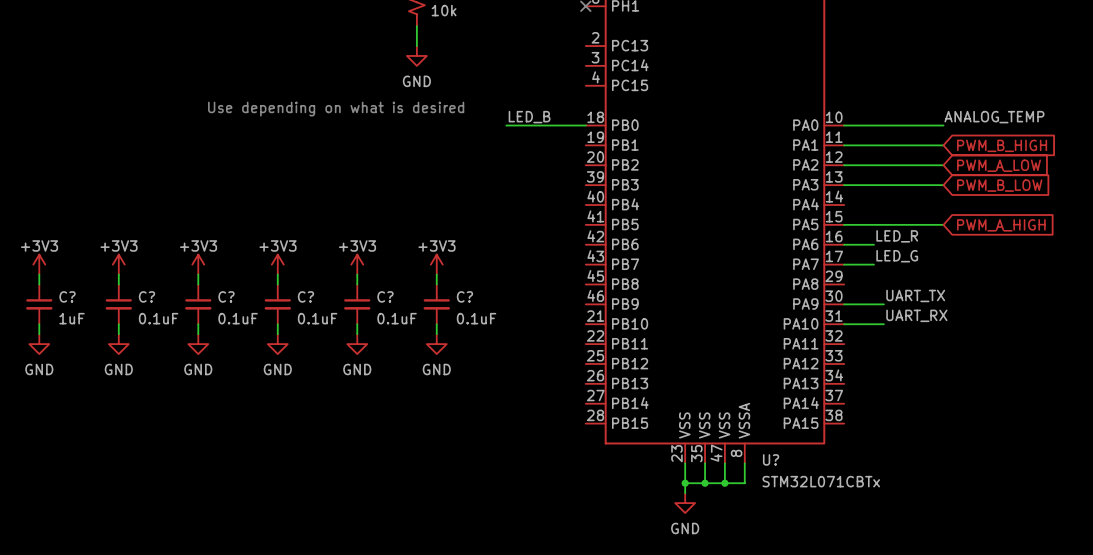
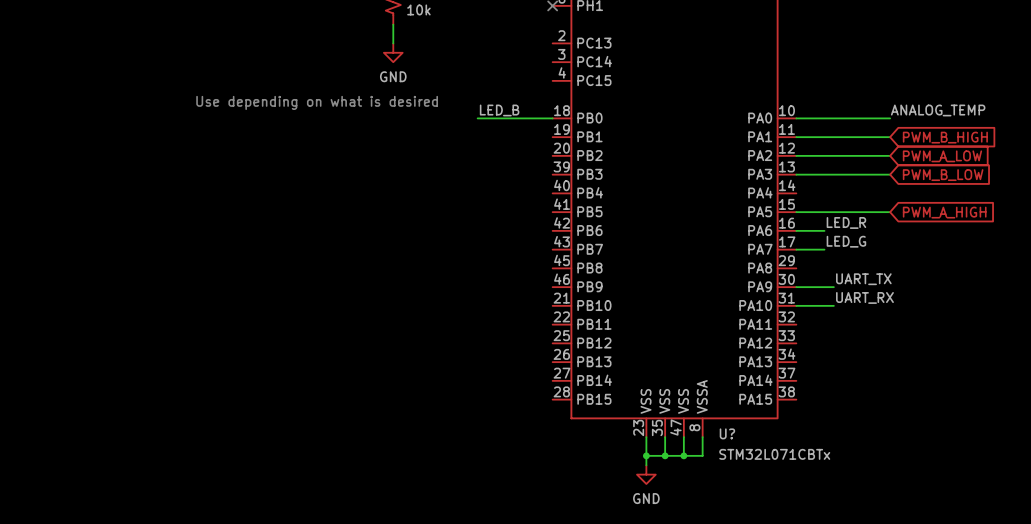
power symbol: +3V3 (39, 264) -> none
power symbol: +3V3 (118, 264) -> none
power symbol: +3V3 (198, 264) -> none
power symbol: +3V3 (277, 264) -> none
power symbol: +3V3 (357, 264) -> none
power symbol: +3V3 (436, 264) -> none
wire: (39, 274) (39, 284) -> none
wire: (118, 274) (118, 284) -> none
wire: (198, 274) (198, 284) -> none
wire: (277, 274) (277, 284) -> none
wire: (357, 274) (357, 284) -> none
wire: (436, 274) (436, 284) -> none
C?: 1uF (39, 304) -> none
C?: 0.1uF (118, 304) -> none
C?: 0.1uF (198, 304) -> none
C?: 0.1uF (277, 304) -> none
C?: 0.1uF (357, 304) -> none
C?: 0.1uF (436, 304) -> none
wire: (39, 324) (39, 334) -> none
wire: (118, 324) (118, 334) -> none
wire: (198, 324) (198, 334) -> none
wire: (277, 324) (277, 334) -> none
wire: (357, 324) (357, 334) -> none
wire: (436, 324) (436, 334) -> none
power symbol: GND (39, 344) -> none
power symbol: GND (118, 344) -> none
power symbol: GND (198, 344) -> none
power symbol: GND (277, 344) -> none
power symbol: GND (357, 344) -> none
power symbol: GND (436, 344) -> none

